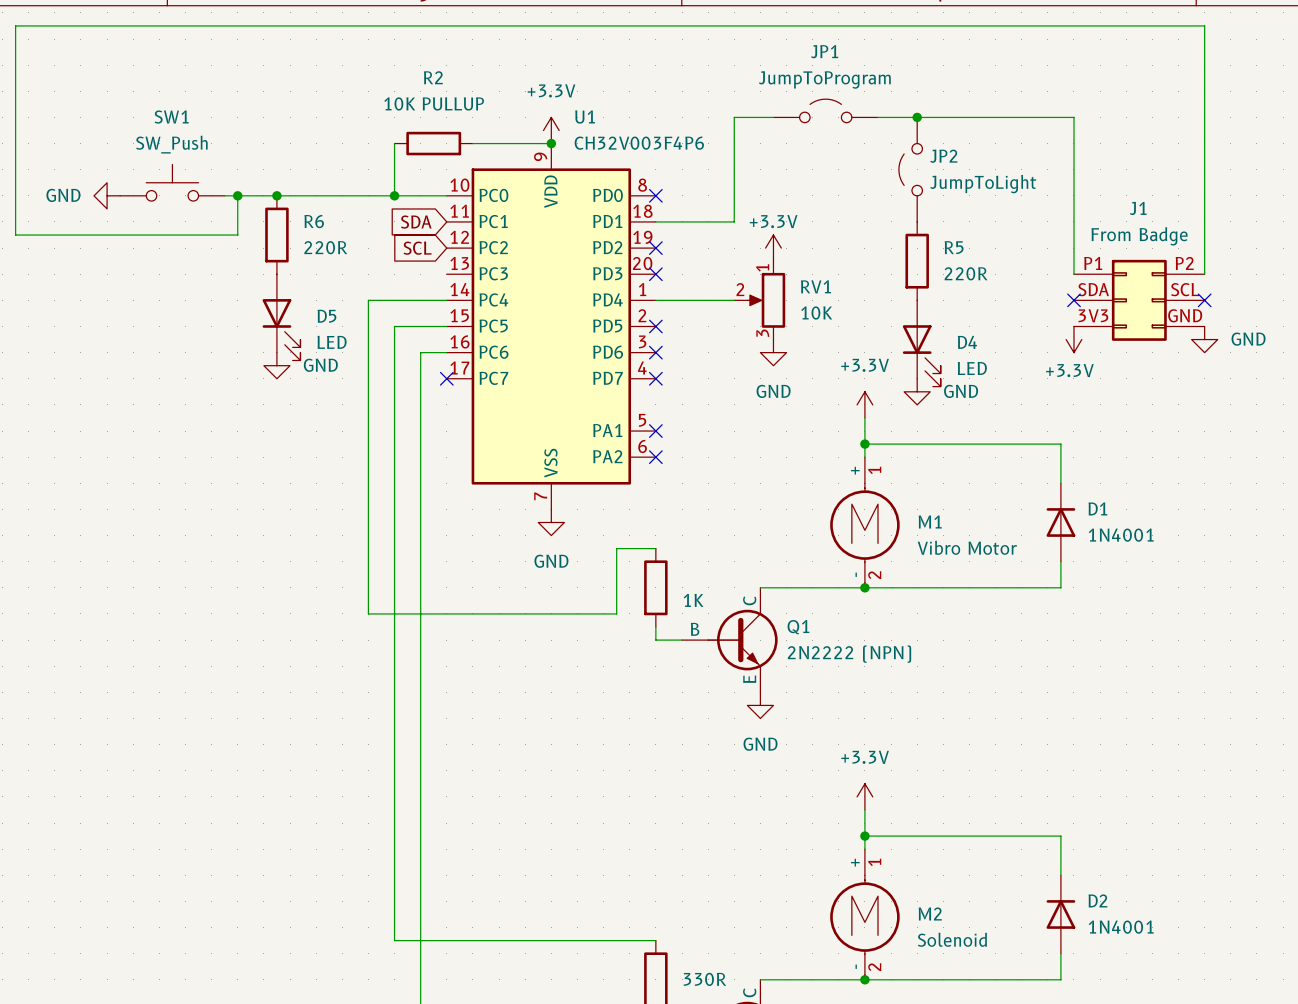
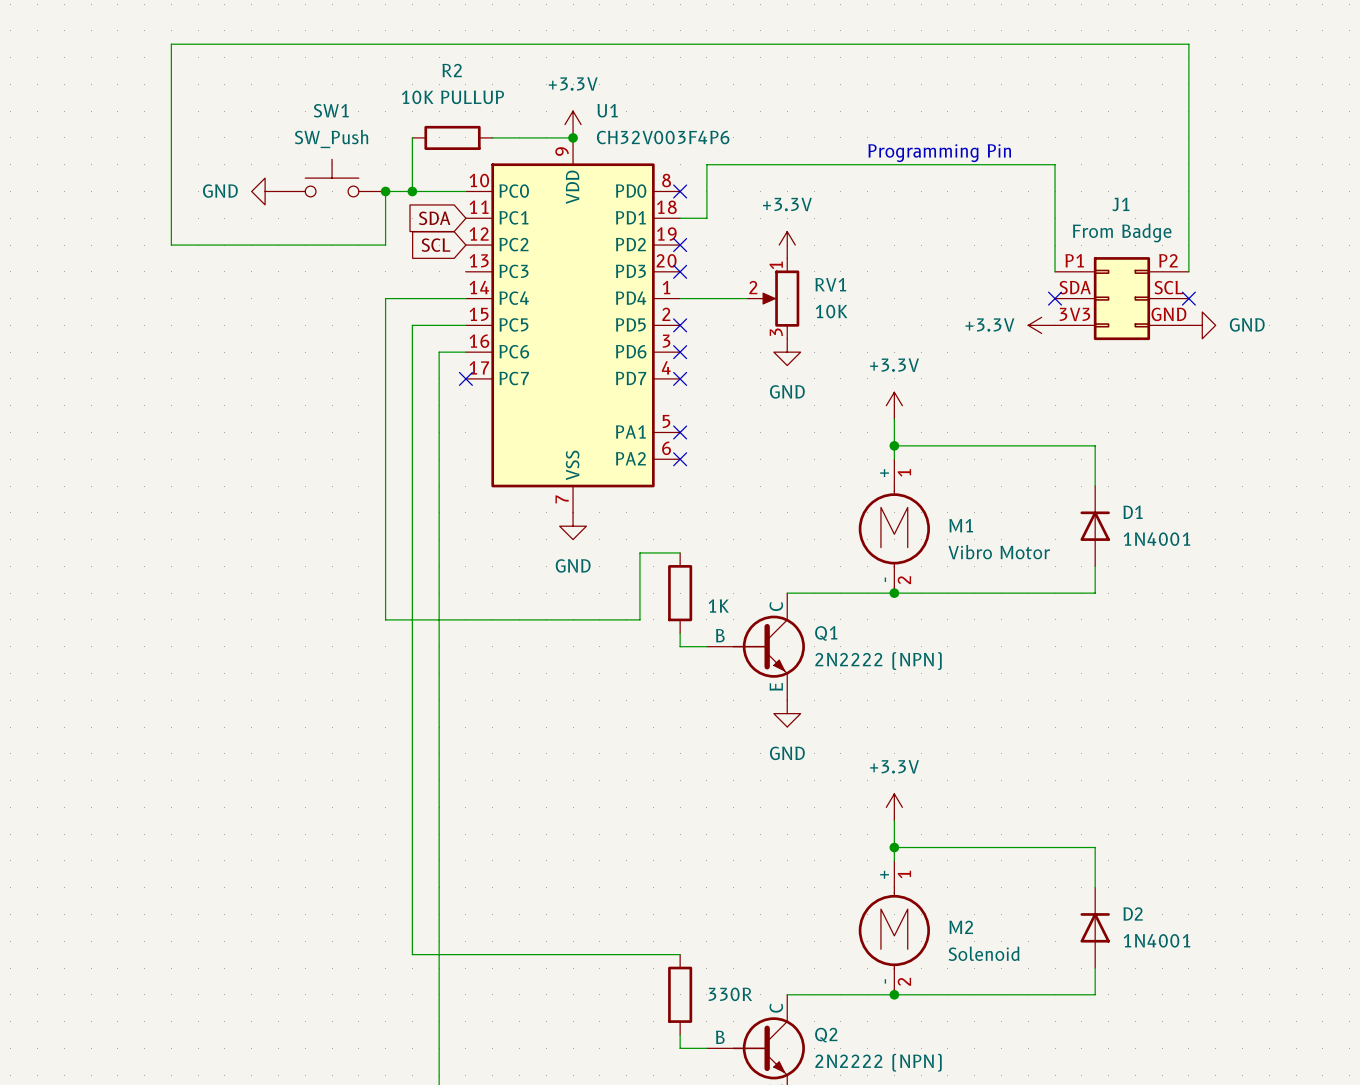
JP1: JumpToProgram (825, 110) -> none
wire: (773, 117) (734, 117) (734, 221) (682, 221) -> (1055, 271) (1055, 164) (706, 164) (706, 218)
wire: (877, 117) (1073, 117) (1073, 274) -> none
junction: (917, 117) -> none
text: none -> Programming Pin (939, 153)
JP2: JumpToLight (910, 169) -> none
SW1 position: (172, 182) -> (332, 178)
power symbol: GND (107, 195) -> none
wire: (224, 195) (368, 195) -> (1188, 271) (1188, 44) (171, 44) (171, 245) (385, 245) (385, 191)
wire: (237, 195) (237, 235) (15, 235) (15, 25) (1204, 25) (1204, 274) -> none
junction: (237, 195) -> none
power symbol: none -> GND (265, 191)
junction: (276, 195) -> none
junction: none -> (385, 191)
power symbol text position: +3.3V (773, 221) -> +3.3V (787, 204)
R6: 220R (276, 235) -> none
power symbol position: +3.3V (773, 248) -> +3.3V (787, 245)
R5: 220R (917, 261) -> none
RV1 position: (759, 300) -> (773, 298)
no-connect mark: none -> (1055, 298)
no-connect mark: (1073, 300) -> none
J1 position: (1139, 300) -> (1121, 298)
no-connect mark: none -> (1188, 298)
no-connect mark: (1204, 300) -> none
D5: LED (281, 317) -> none
power symbol rotation: 0° (1073, 339) -> 90° clockwise (1041, 325)
power symbol position: +3.3V (1073, 339) -> +3.3V (1041, 325)
power symbol rotation: 0° (1204, 339) -> 90° counterclockwise (1202, 325)
power symbol position: GND (1204, 339) -> GND (1202, 325)
D4: LED (921, 343) -> none
power symbol position: GND (773, 352) -> GND (787, 352)
power symbol: GND (276, 365) -> none
power symbol text position: +3.3V (1069, 370) -> +3.3V (989, 324)
power symbol: GND (917, 391) -> none

